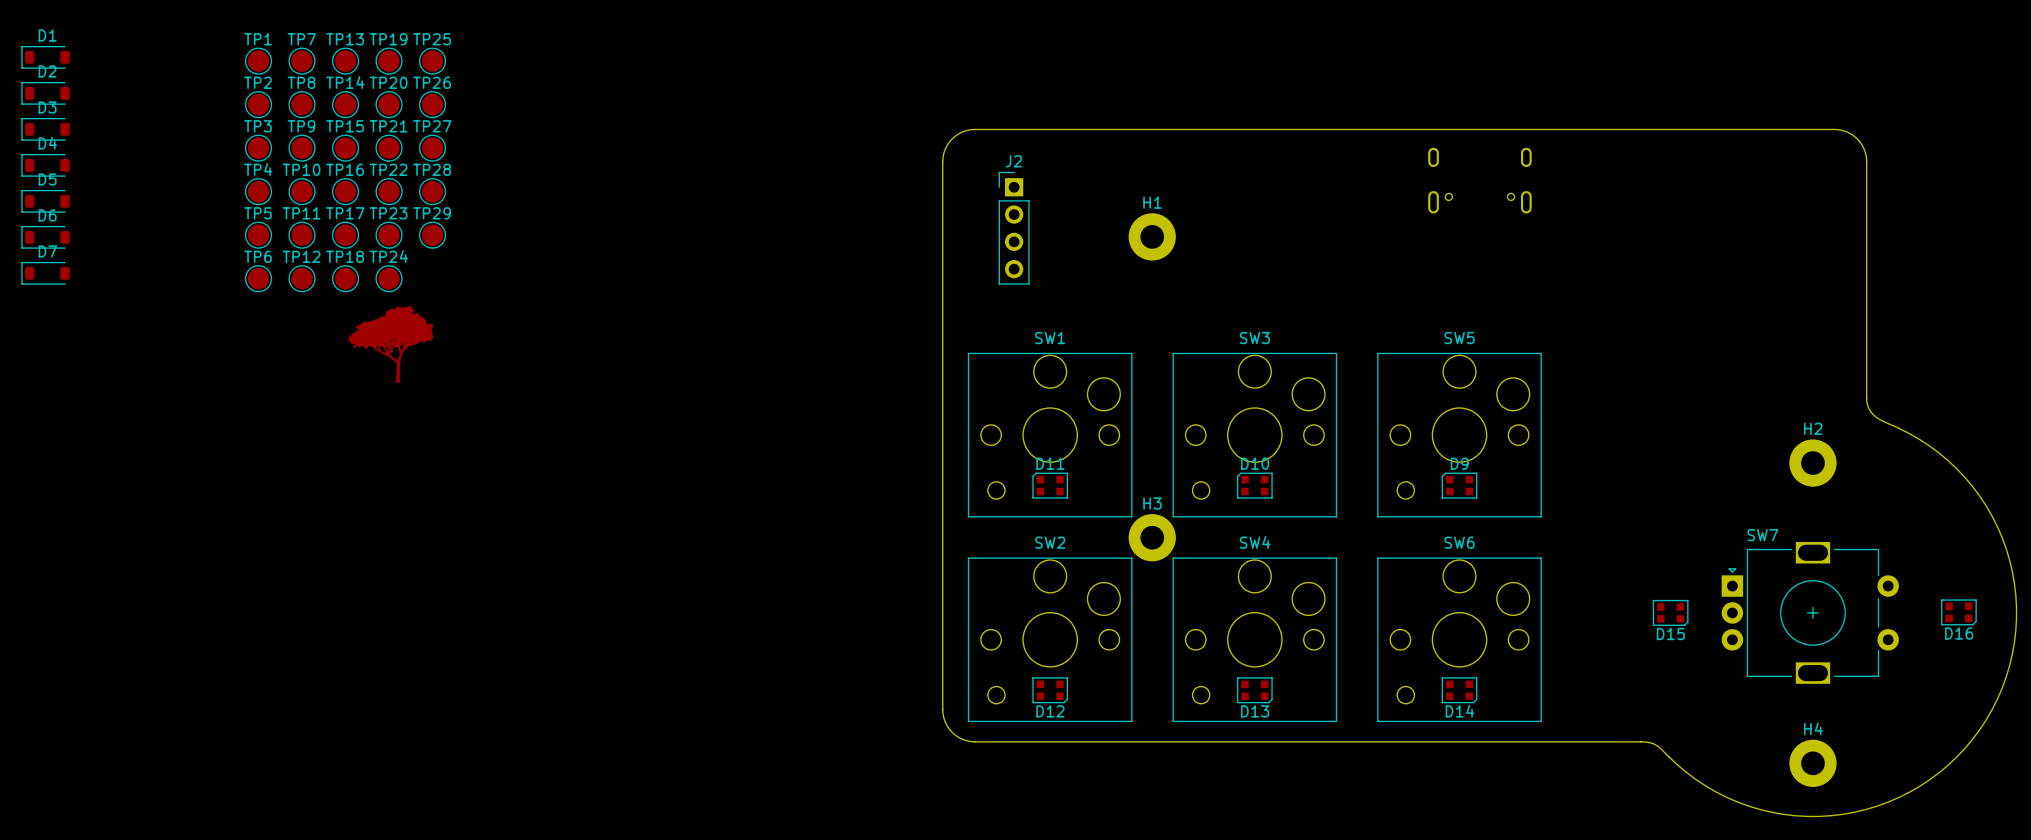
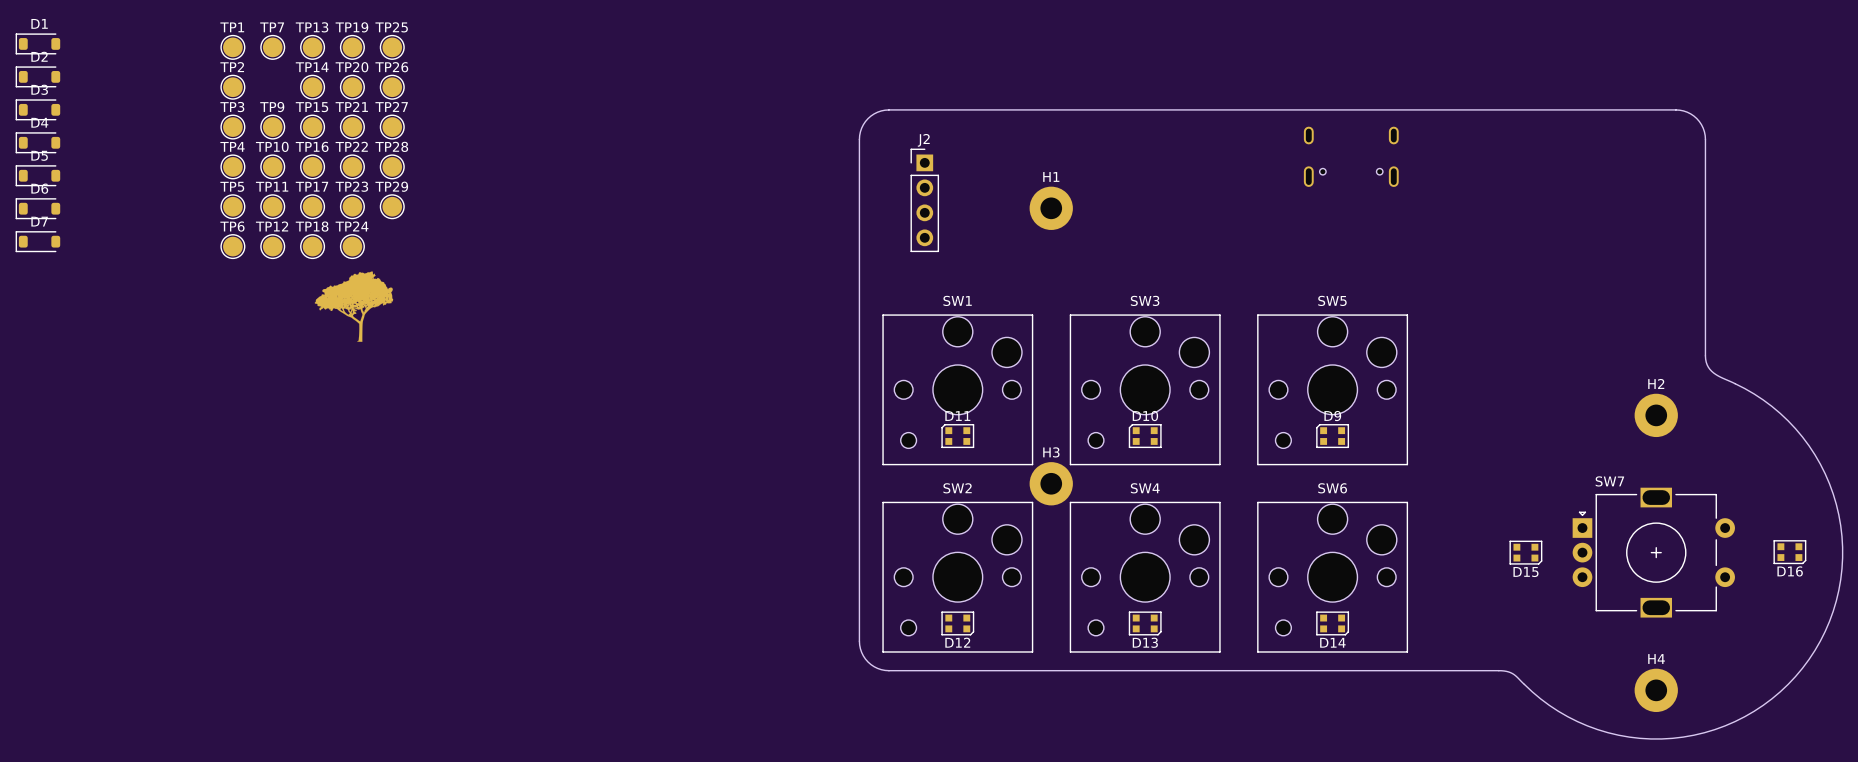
TP8: (302, 104) -> none

